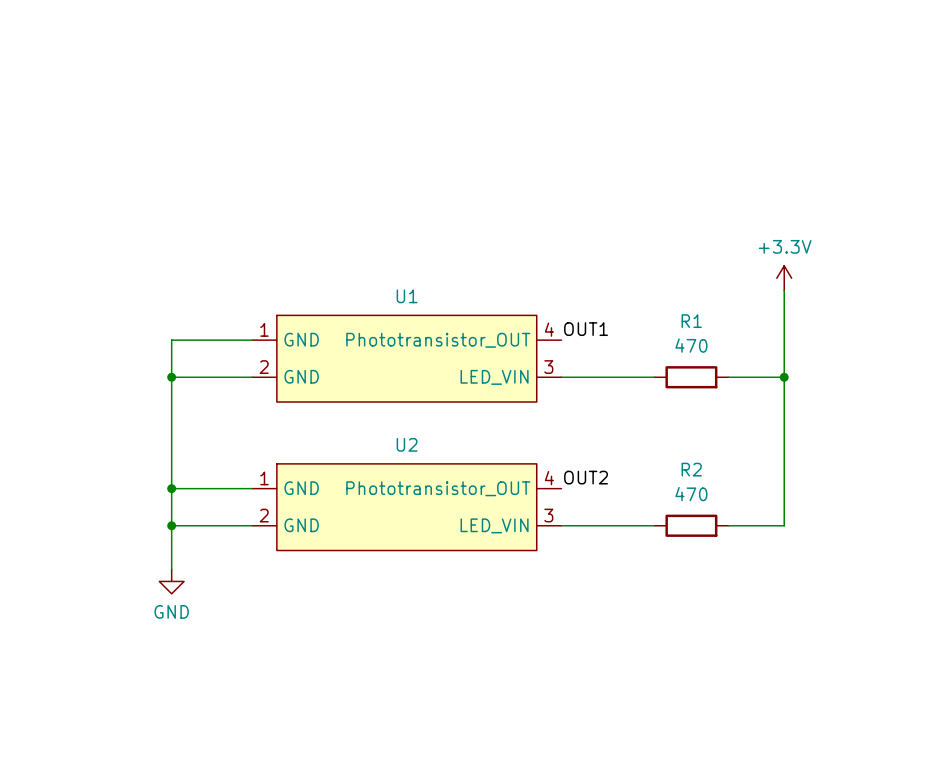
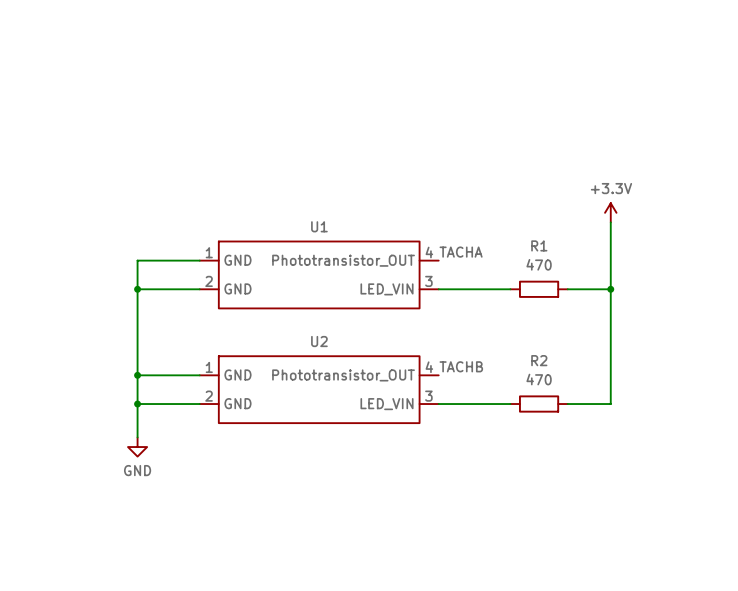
label: OUT1 (586, 329) -> TACHA (461, 252)
label: OUT2 (586, 477) -> TACHB (461, 366)

